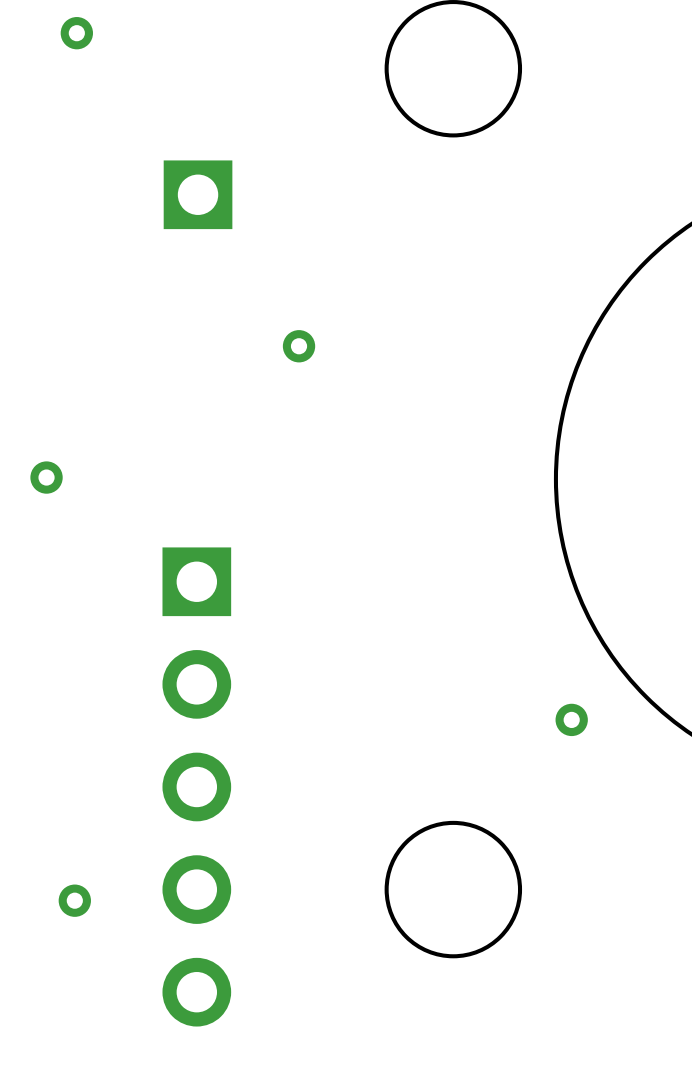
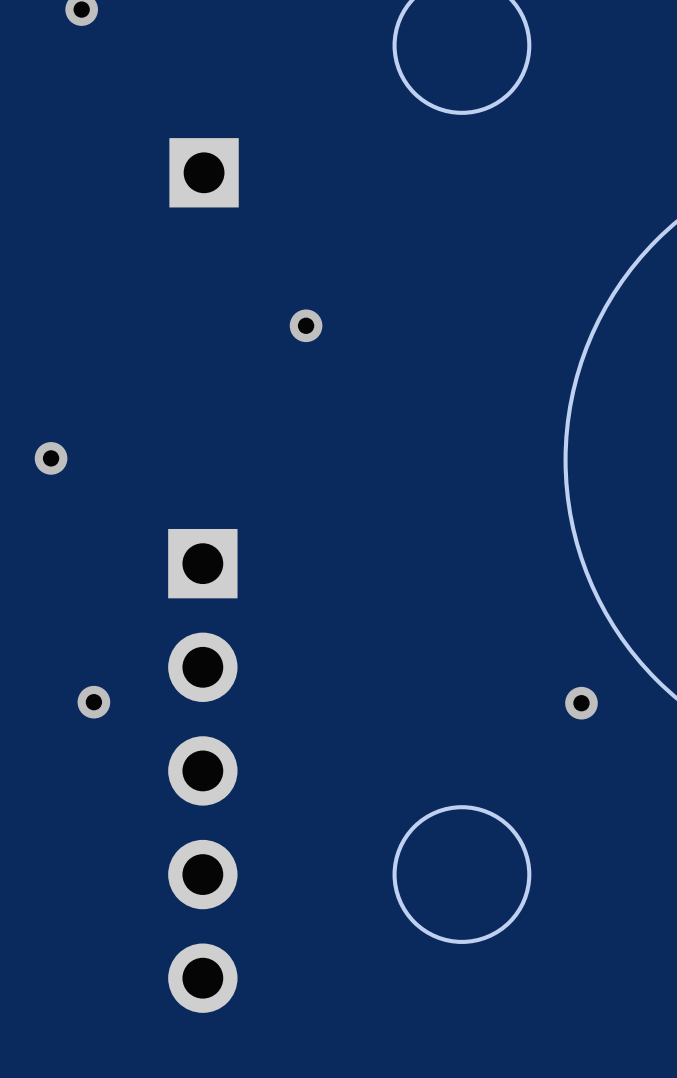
via: none -> (93, 702)
via: (74, 900) -> none

